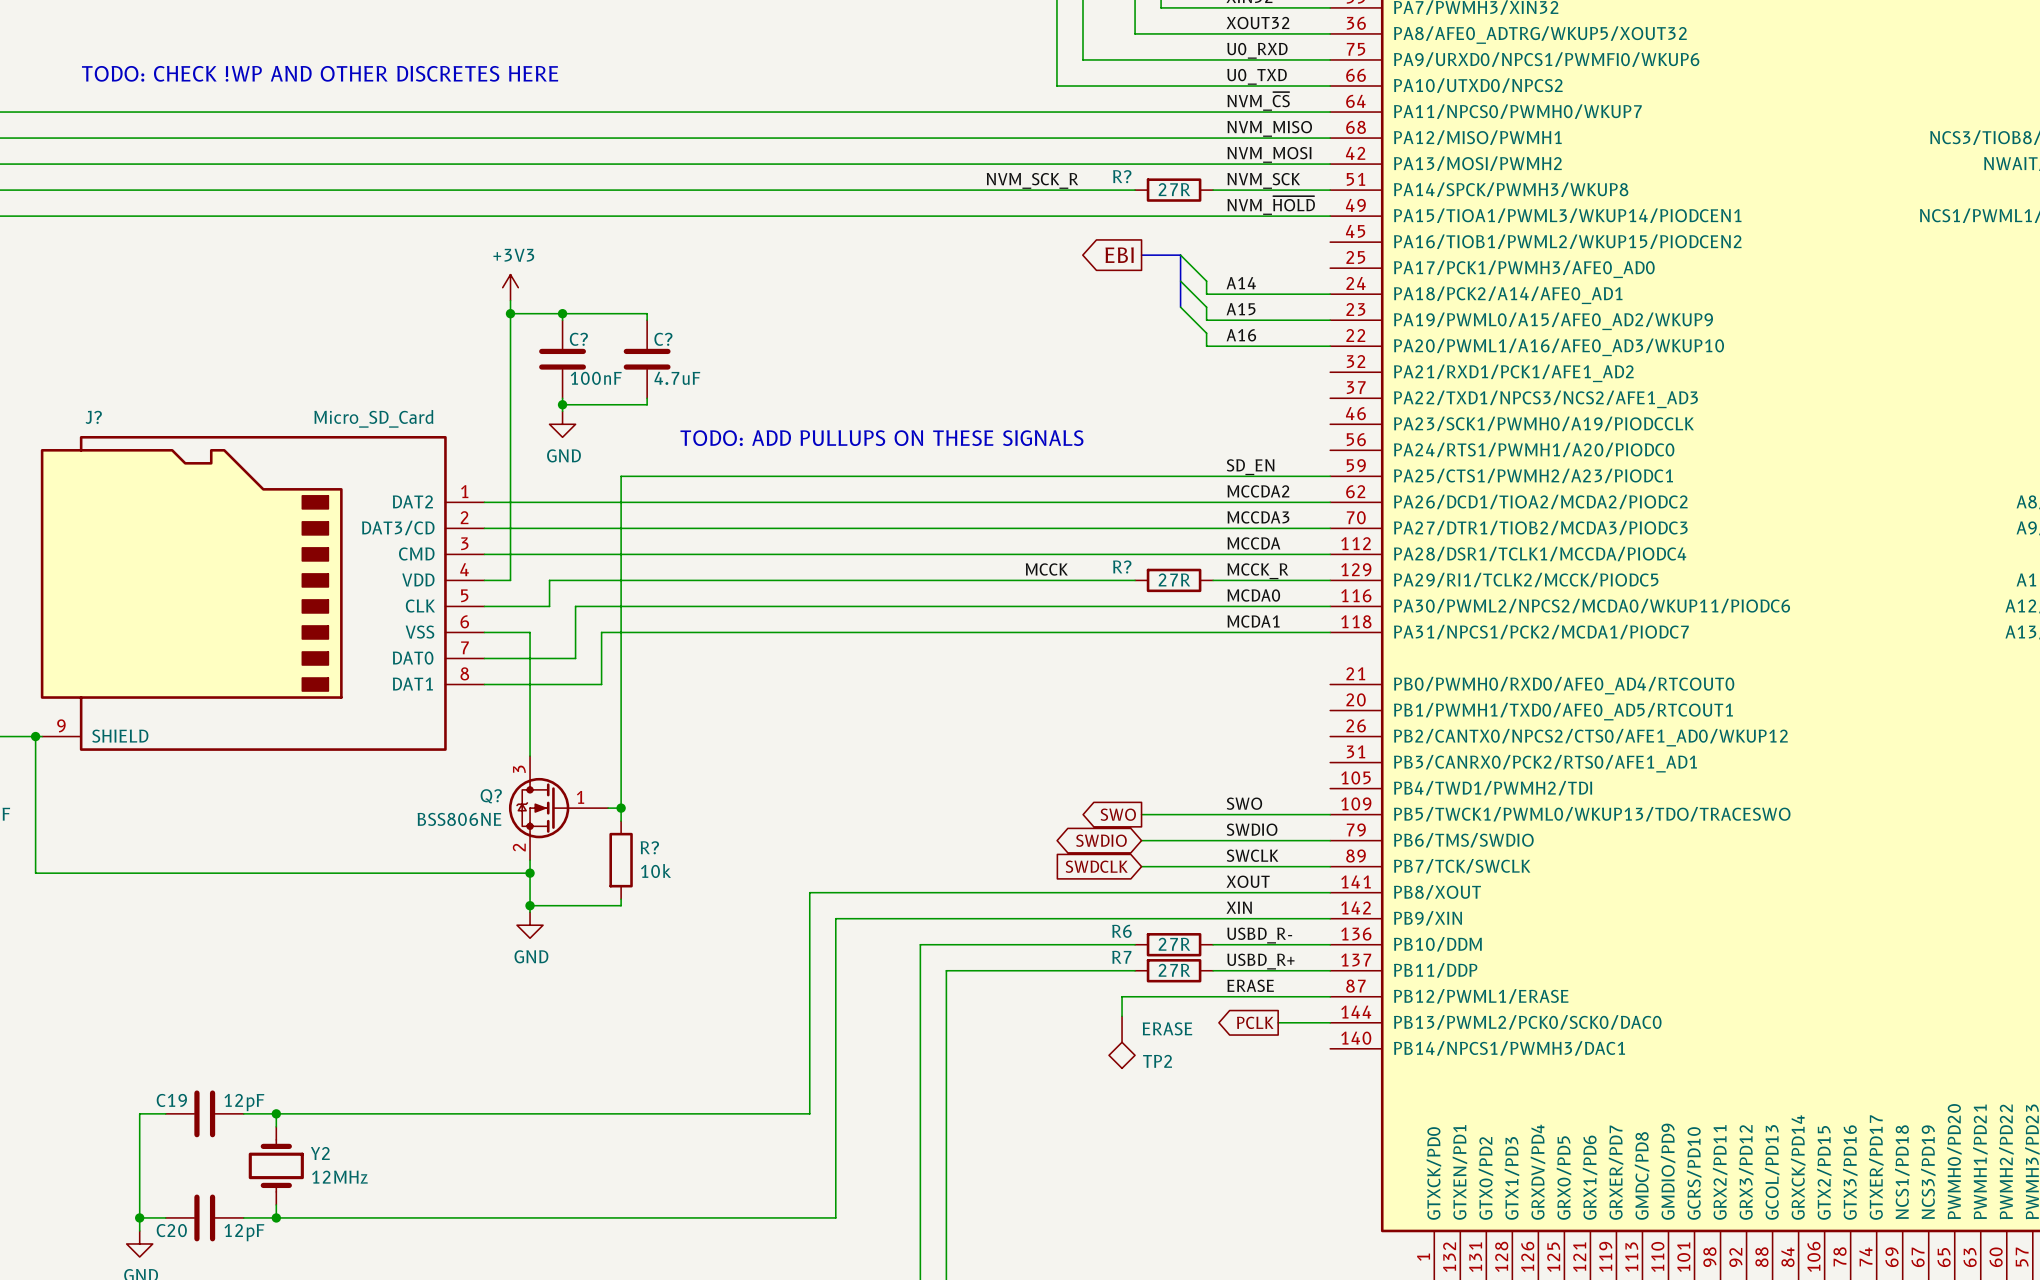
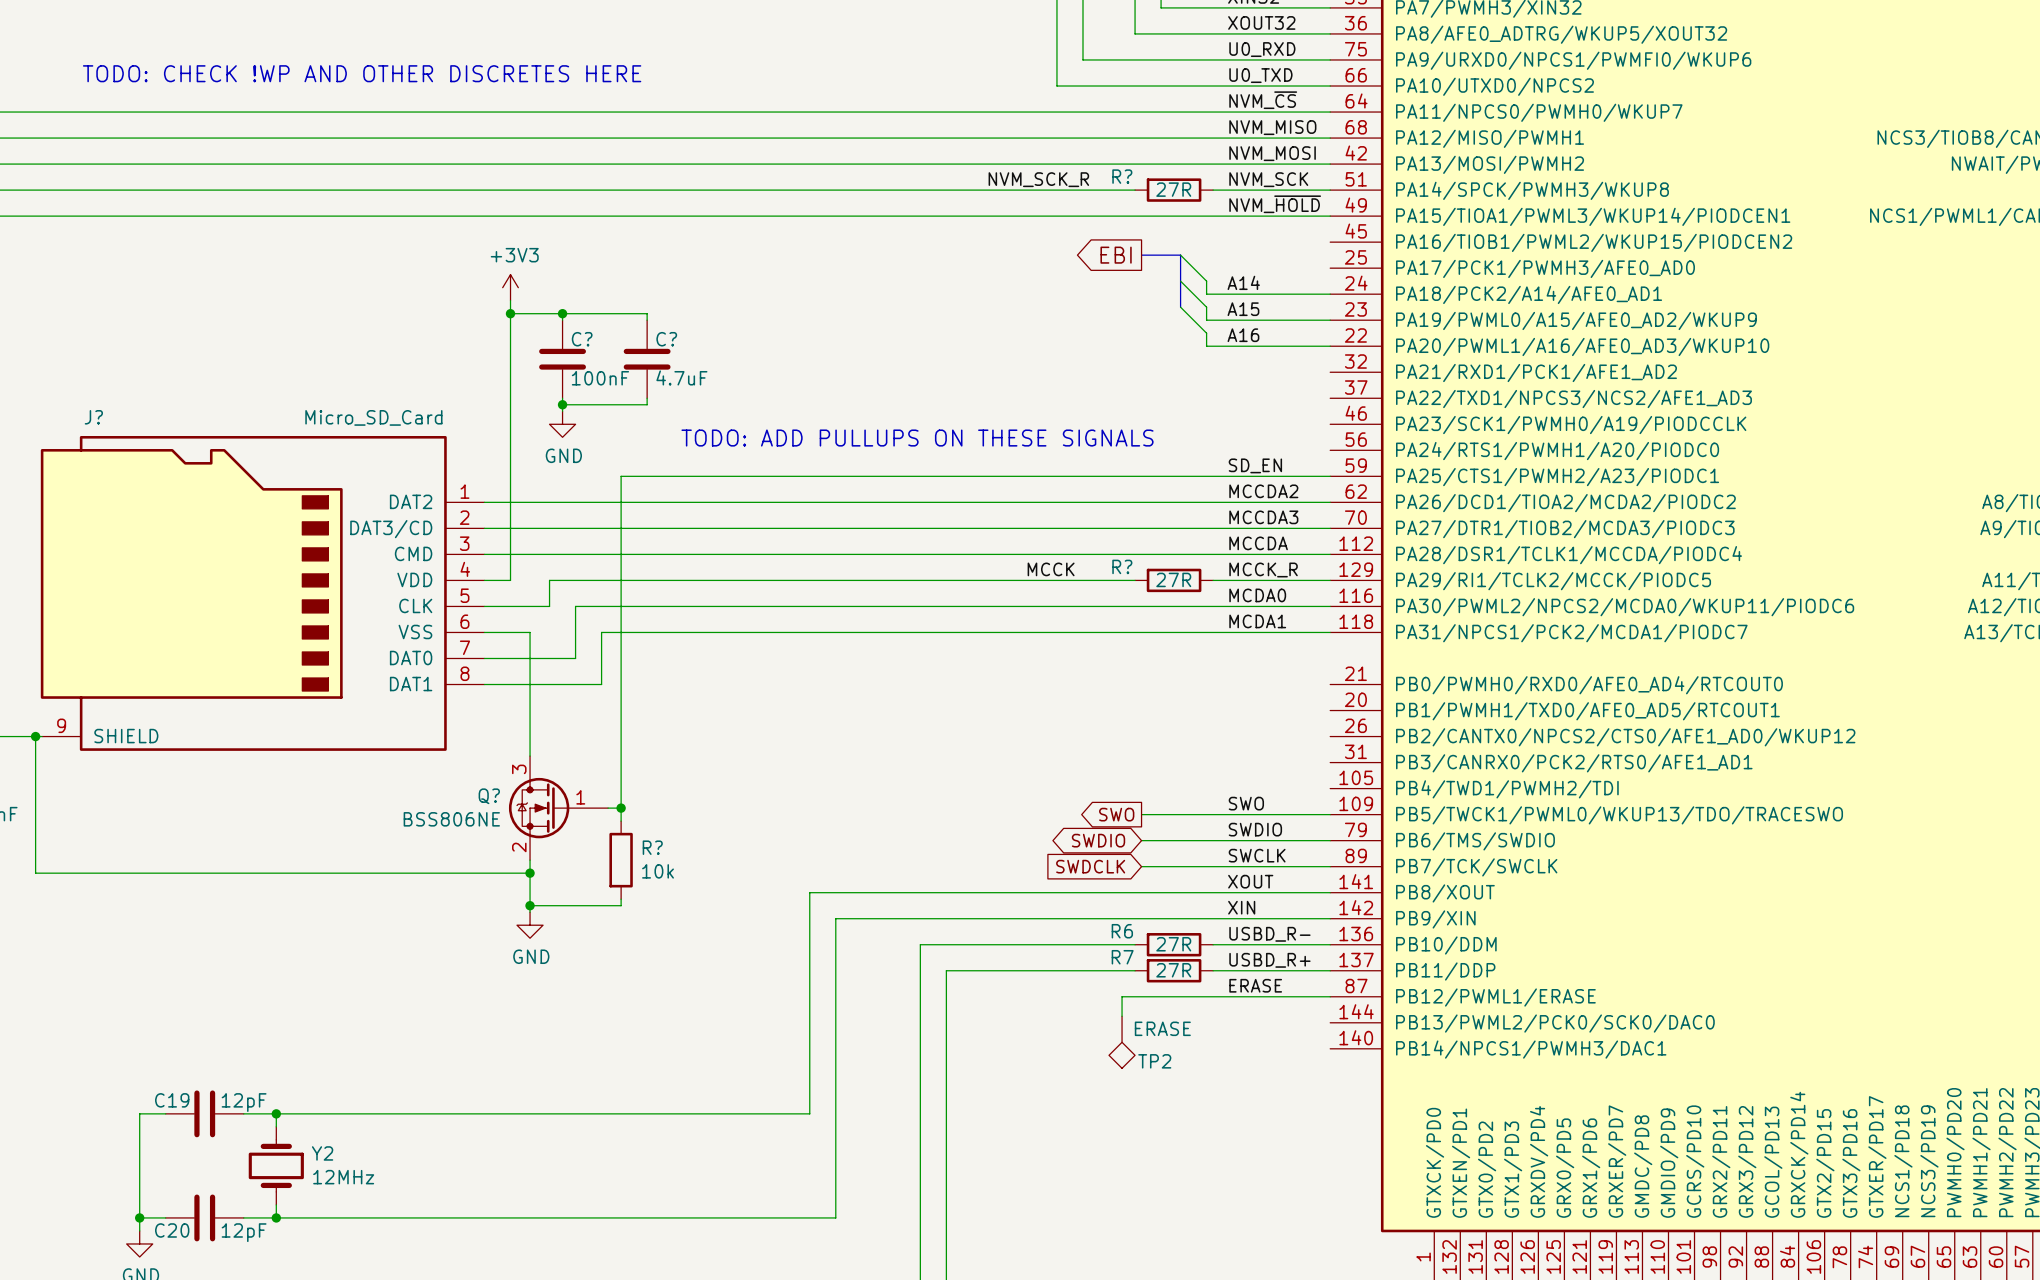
global label: PCLK (1255, 1022) -> none
wire: (1278, 1022) (1330, 1022) -> none

